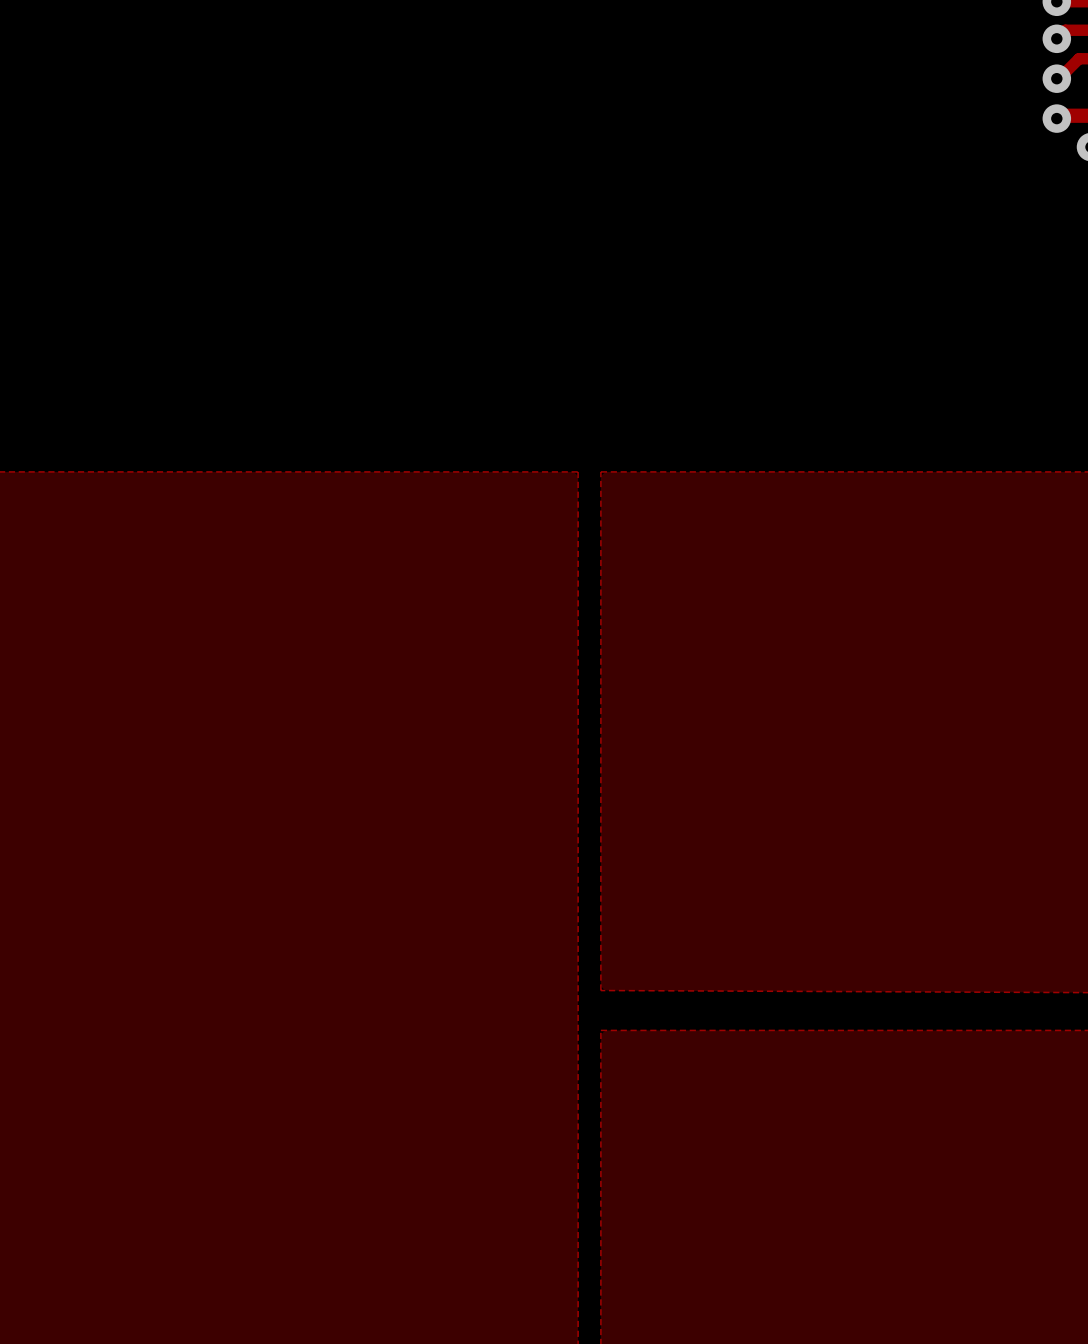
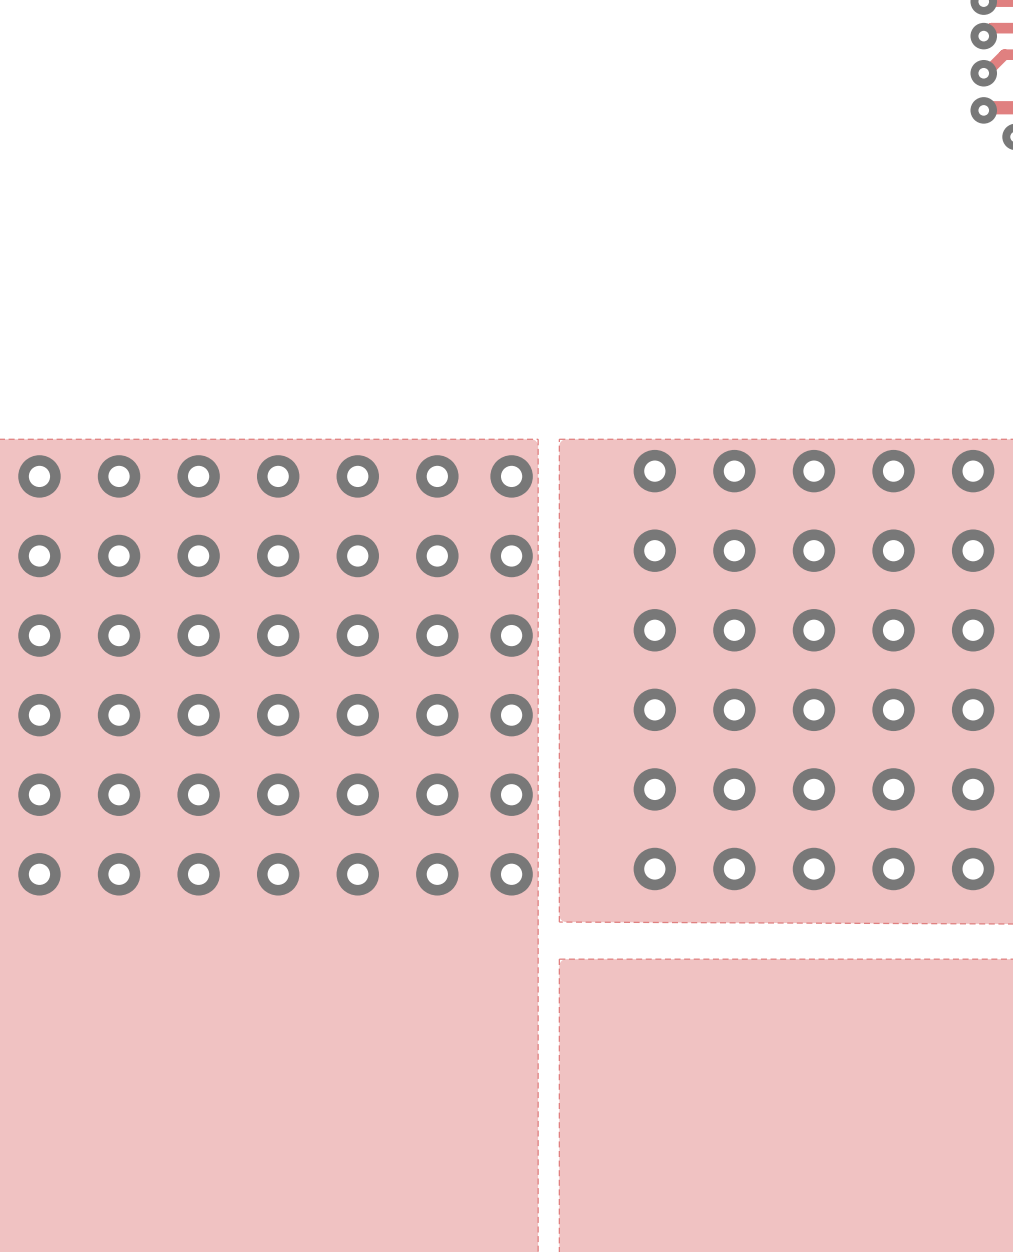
via: none -> (654, 471)
via: none -> (734, 471)
via: none -> (813, 471)
via: none -> (893, 471)
via: none -> (973, 471)
via: none -> (39, 476)
via: none -> (119, 476)
via: none -> (198, 476)
via: none -> (278, 476)
via: none -> (357, 476)
via: none -> (437, 476)
via: none -> (511, 476)
via: none -> (654, 550)
via: none -> (734, 550)
via: none -> (813, 550)
via: none -> (893, 550)
via: none -> (973, 550)
via: none -> (39, 556)
via: none -> (119, 556)
via: none -> (198, 556)
via: none -> (278, 556)
via: none -> (357, 556)
via: none -> (437, 556)
via: none -> (511, 556)
via: none -> (654, 630)
via: none -> (734, 630)
via: none -> (813, 630)
via: none -> (893, 630)
via: none -> (973, 630)
via: none -> (39, 635)
via: none -> (119, 635)
via: none -> (198, 635)
via: none -> (278, 635)
via: none -> (357, 635)
via: none -> (437, 635)
via: none -> (511, 635)
via: none -> (654, 709)
via: none -> (734, 709)
via: none -> (813, 709)
via: none -> (893, 709)
via: none -> (973, 709)
via: none -> (39, 715)
via: none -> (119, 715)
via: none -> (198, 715)
via: none -> (278, 715)
via: none -> (357, 715)
via: none -> (437, 715)
via: none -> (511, 715)
via: none -> (654, 789)
via: none -> (734, 789)
via: none -> (813, 789)
via: none -> (893, 789)
via: none -> (973, 789)
via: none -> (39, 794)
via: none -> (119, 794)
via: none -> (198, 794)
via: none -> (278, 794)
via: none -> (357, 794)
via: none -> (437, 794)
via: none -> (511, 794)
via: none -> (654, 868)
via: none -> (734, 868)
via: none -> (813, 868)
via: none -> (893, 868)
via: none -> (973, 868)
via: none -> (39, 874)
via: none -> (119, 874)
via: none -> (198, 874)
via: none -> (278, 874)
via: none -> (357, 874)
via: none -> (437, 874)
via: none -> (511, 874)

